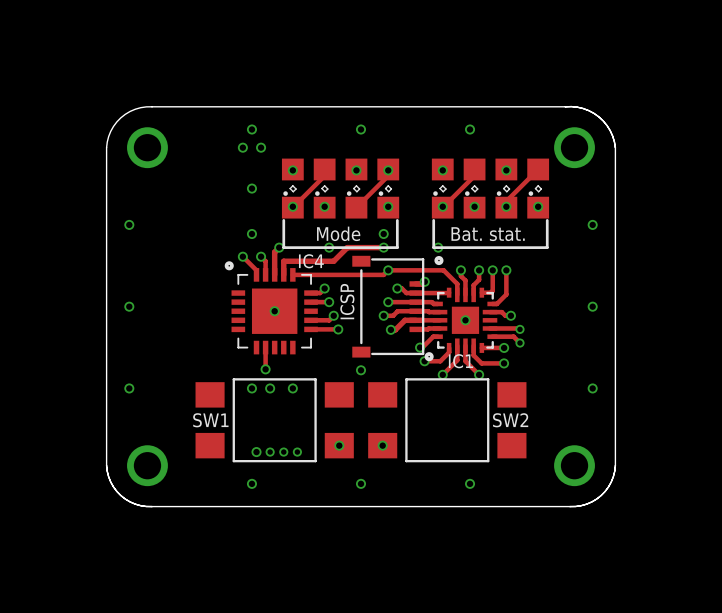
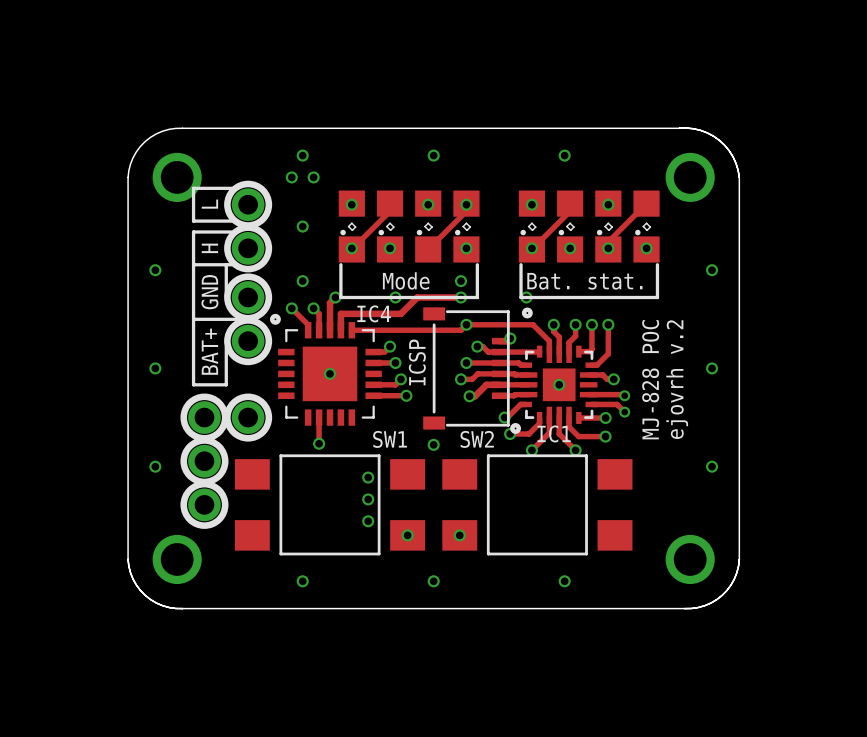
line: none -> (231, 188) (193, 188) (193, 221) (231, 221)
L: none -> (248, 204)
line: none -> (231, 232) (193, 232) (193, 384) (226, 384) (226, 346)
H: none -> (248, 248)
line: none -> (193, 264) (231, 264)
line: none -> (226, 264) (226, 297)
GND: none -> (248, 297)
line: none -> (193, 319) (248, 319)
BAT+: none -> (248, 341)
text: none -> MJ-828 POC (650, 379)
text: none -> ejovrh v.2 (677, 379)
part: none -> (204, 417)
part: none -> (248, 417)
part: none -> (204, 461)
via: (251, 388) -> none
via: (270, 388) -> none
via: (292, 388) -> none
via: none -> (368, 477)
via: none -> (368, 499)
part: none -> (204, 504)
SW1 name position: SW1 (210, 420) -> SW1 (390, 439)
SW2 name position: SW2 (510, 420) -> SW2 (477, 439)
via: none -> (368, 521)
via: (256, 452) -> none
via: (270, 452) -> none
via: (283, 452) -> none
via: (297, 452) -> none

